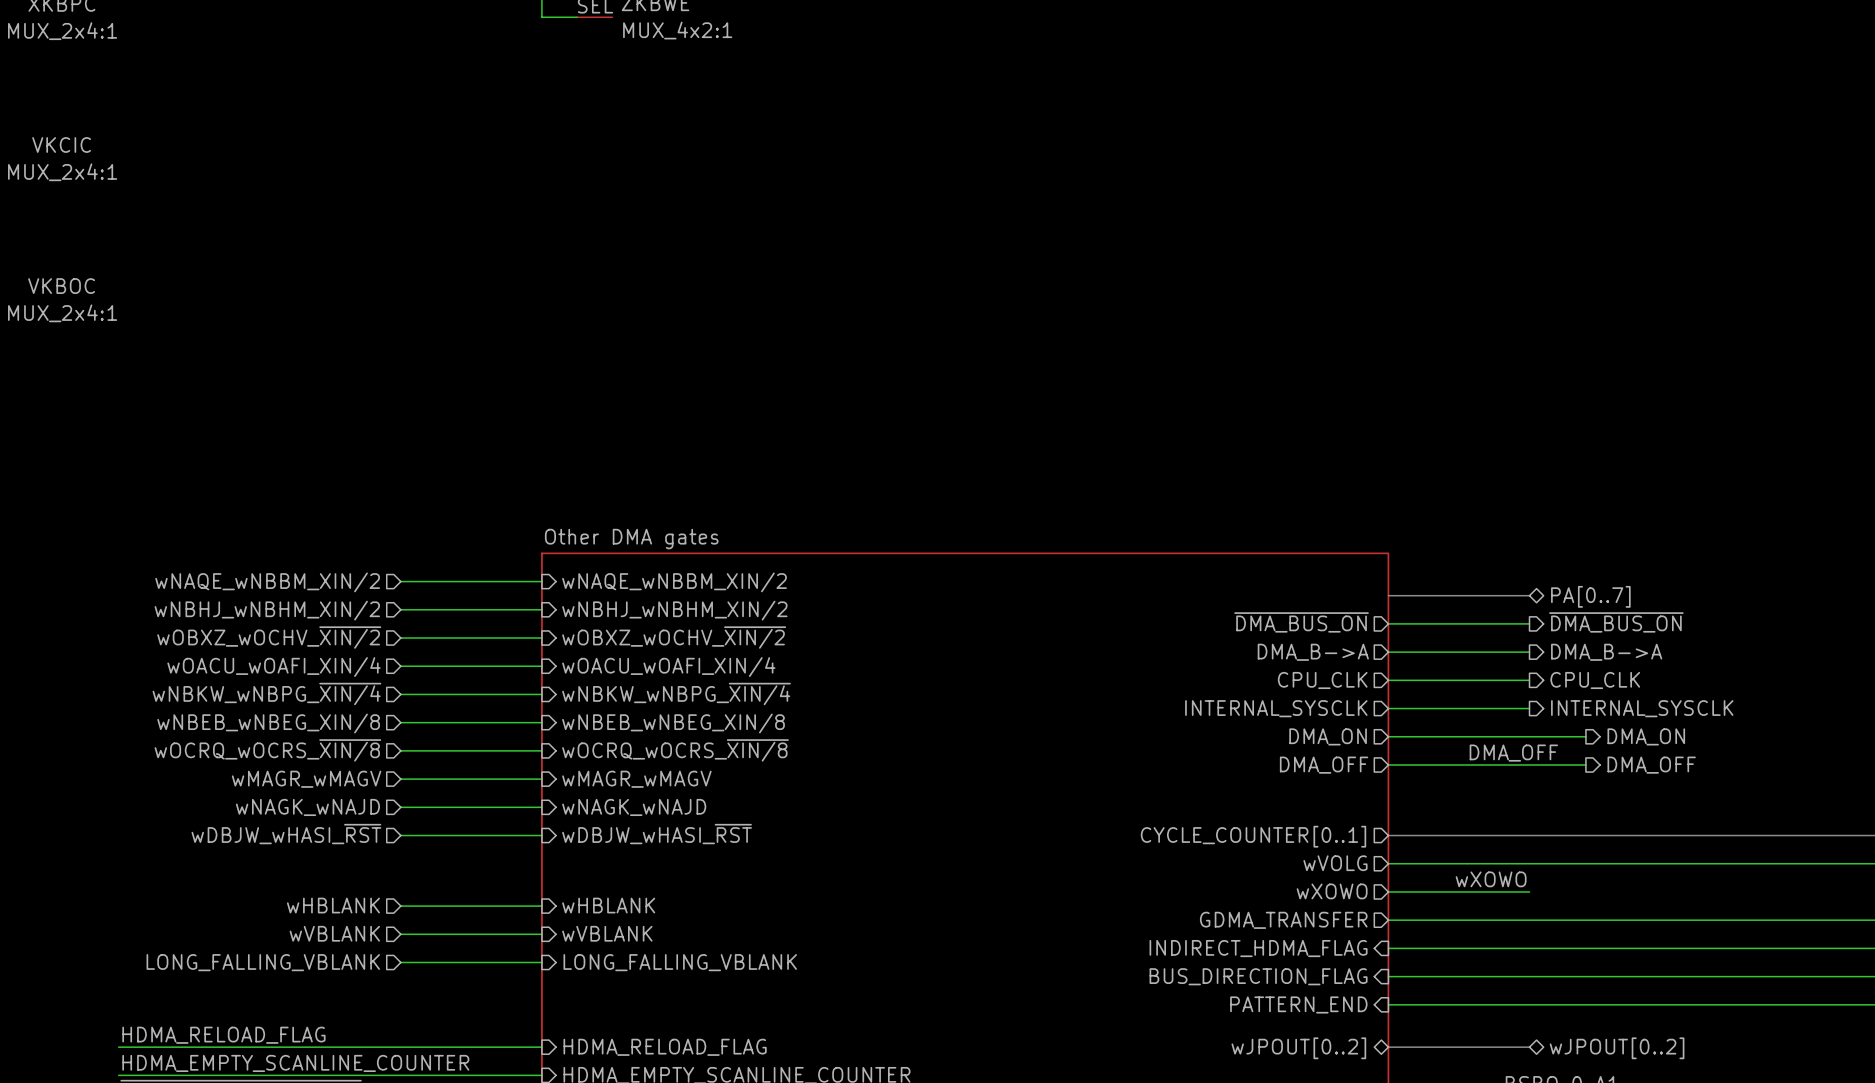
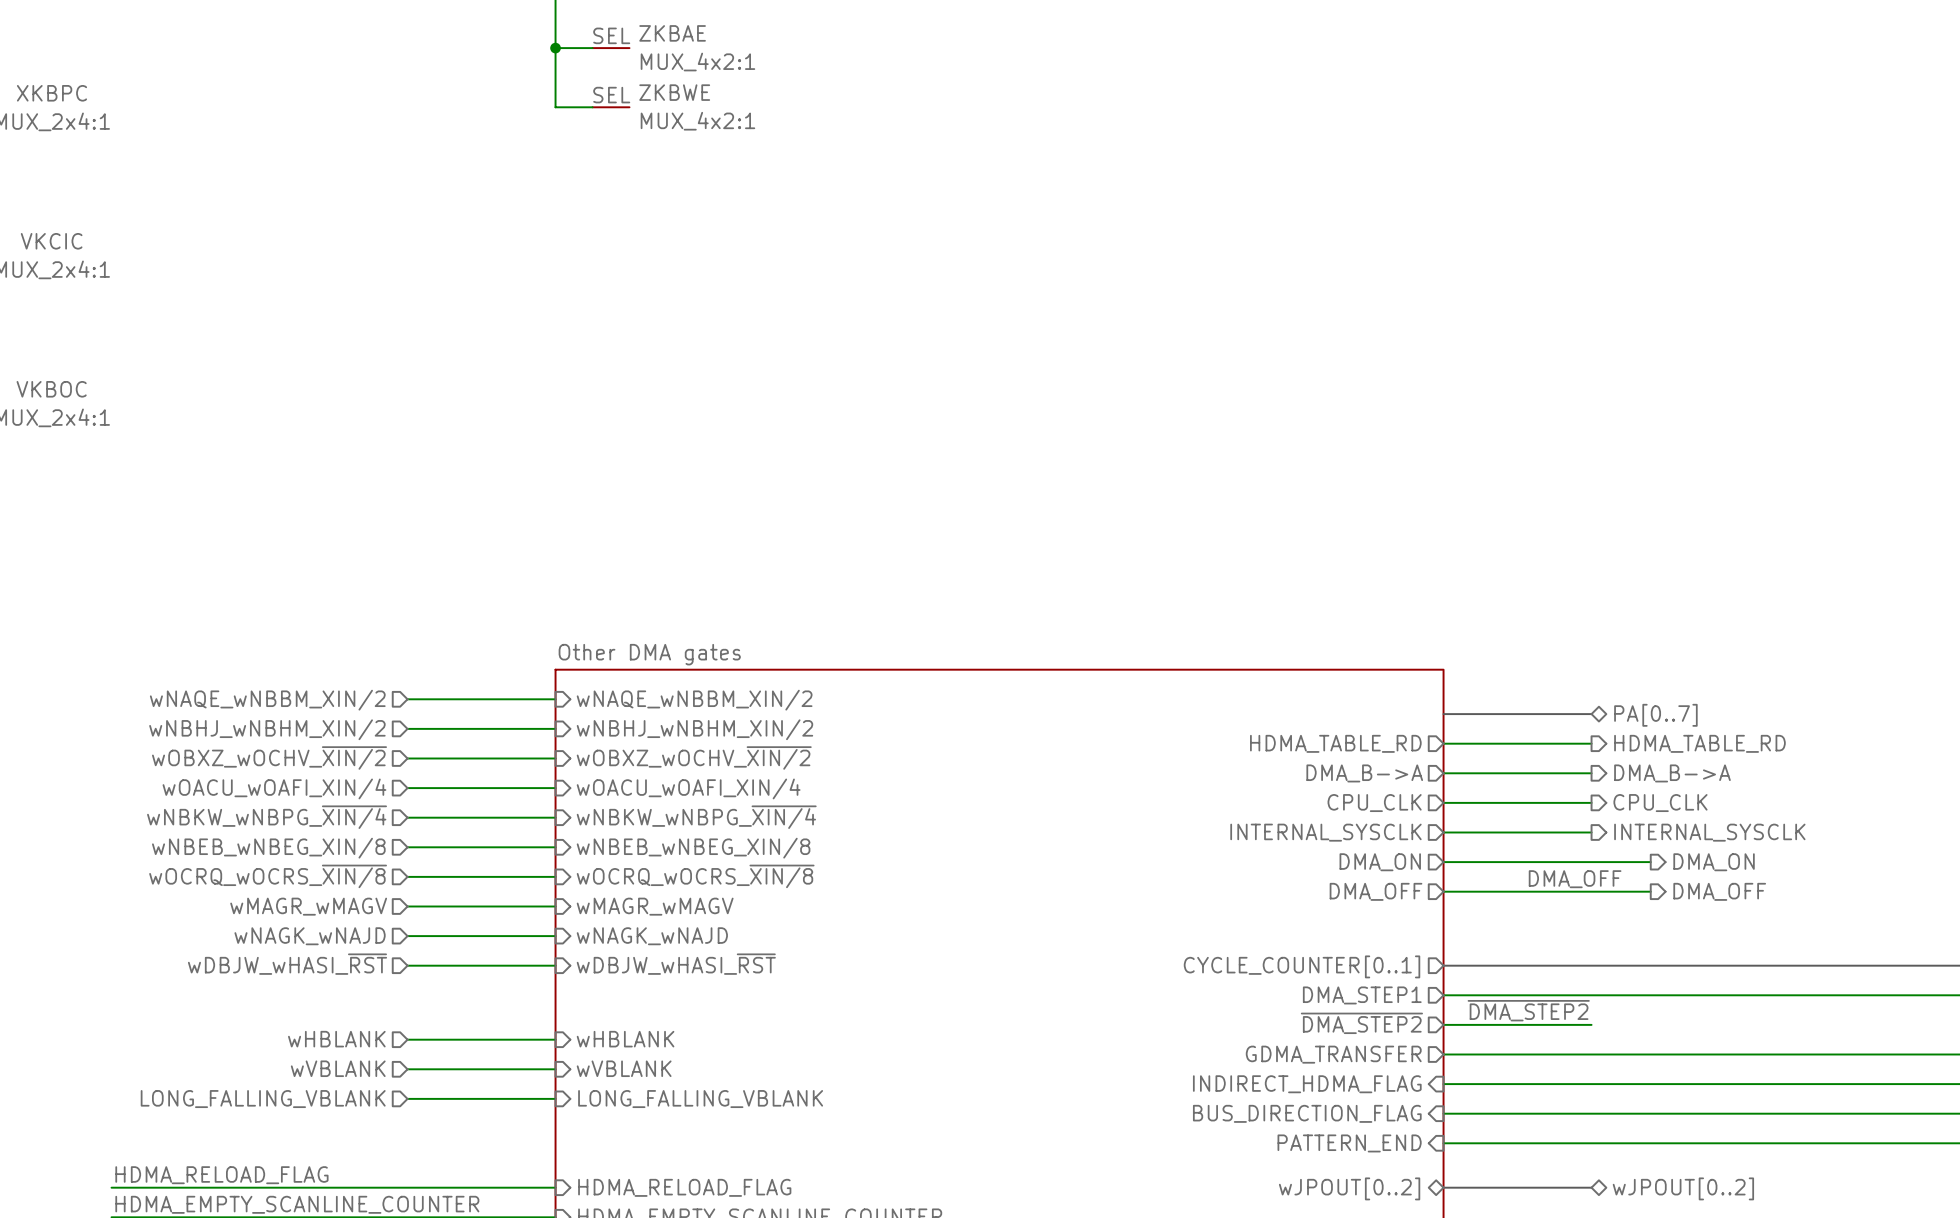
sheet pin: ~{DMA_BUS_ON} (1301, 622) -> HDMA_TABLE_RD (1335, 743)
hierarchical label: ~{DMA_BUS_ON} (1616, 622) -> HDMA_TABLE_RD (1699, 743)
sheet pin: wVOLG (1335, 863) -> DMA_STEP1 (1362, 995)
label: wXOWO (1491, 879) -> ~{DMA_STEP2} (1528, 1010)
sheet pin: wXOWO (1332, 891) -> ~{DMA_STEP2} (1361, 1023)

